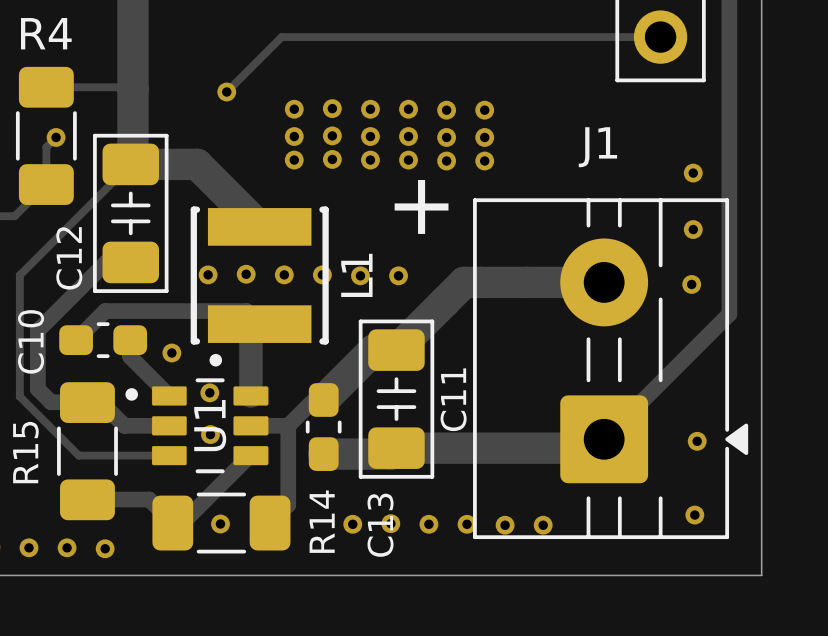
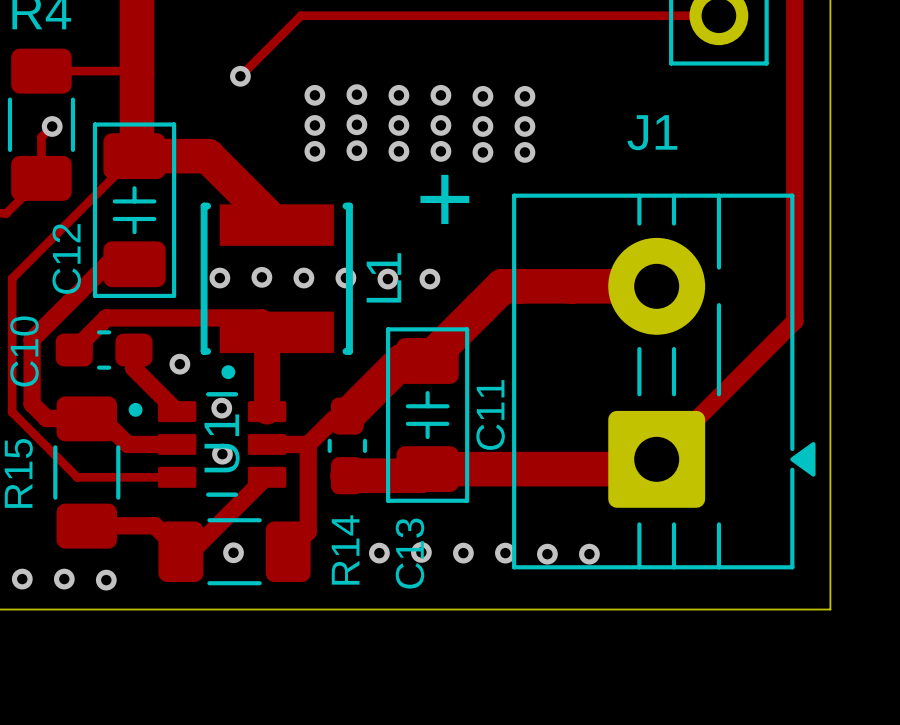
via: (693, 173) -> none
via: (693, 229) -> none
via: (691, 284) -> none
via: (697, 441) -> none
via: (694, 515) -> none

